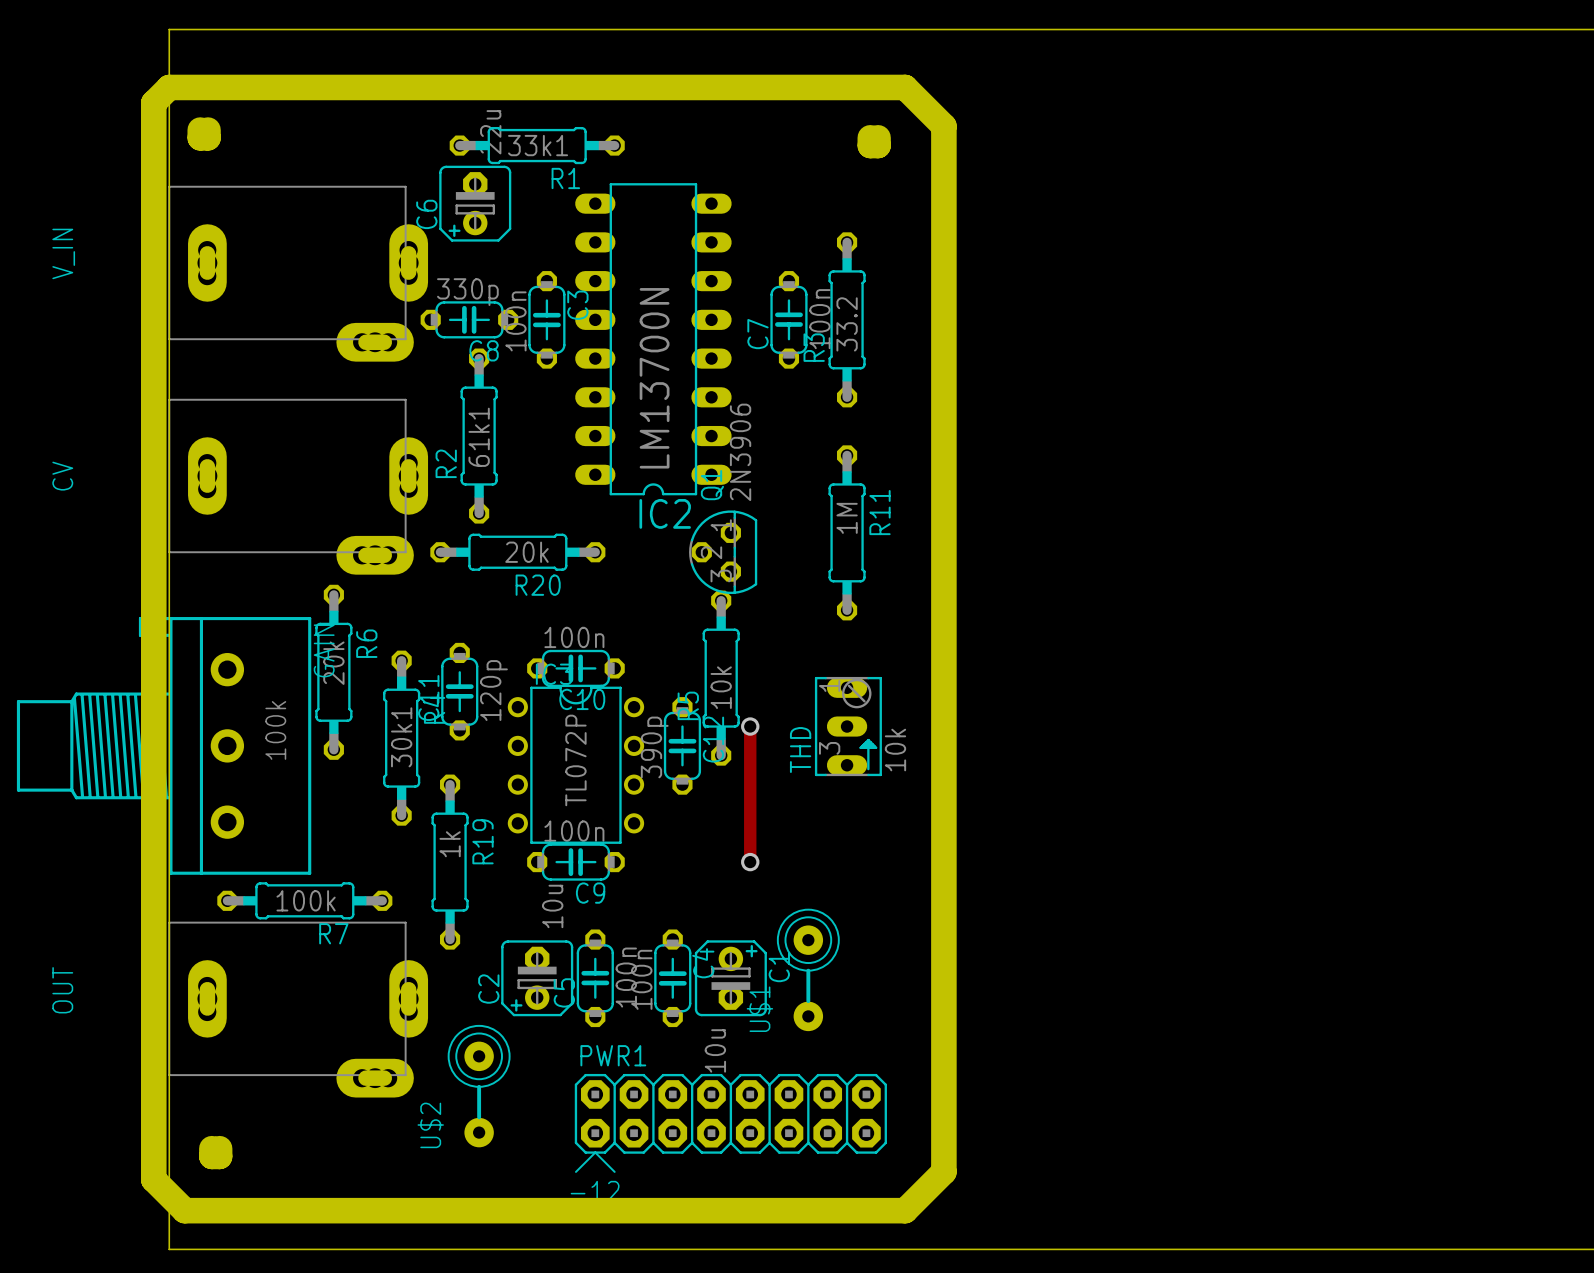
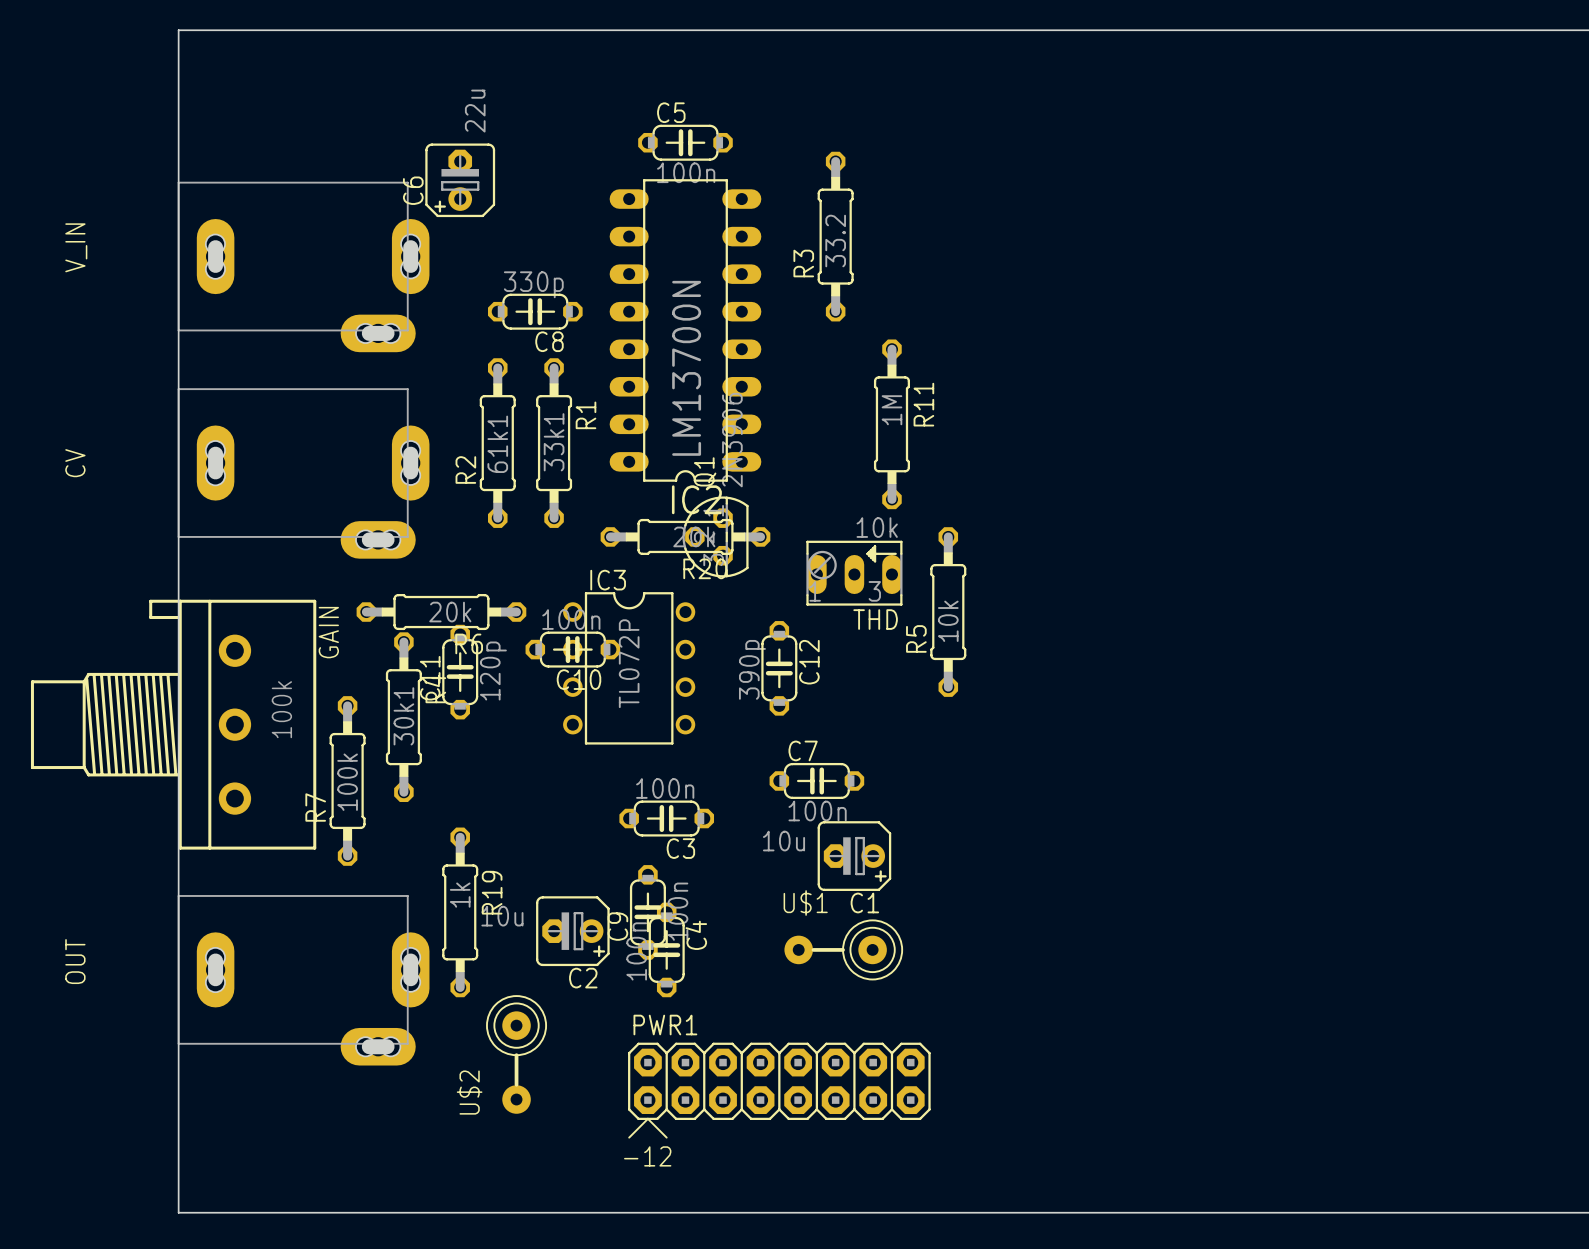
board edge: (169, 87) (905, 87) (943, 126) (943, 1171) (905, 1210) (184, 1210) (153, 1179) (153, 102) (169, 87) -> none
board edge: (200, 130) (200, 137) (208, 137) (208, 130) -> none
board edge: (870, 137) (870, 145) (878, 145) (878, 137) -> none
R1 rotation: 0° (537, 145) -> 90° clockwise (554, 443)
R1 position: (537, 145) -> (554, 443)
R1 name position: R1 (565, 178) -> R1 (585, 415)
C6 position: (475, 203) -> (460, 180)
C8 position: (469, 319) -> (535, 311)
C3 rotation: 0° (546, 319) -> 90° clockwise (666, 818)
C3 position: (546, 319) -> (666, 818)
C7 rotation: 0° (788, 319) -> 90° clockwise (816, 780)
C7 position: (788, 319) -> (816, 780)
R3 position: (847, 319) -> (835, 236)
IC2 position: (653, 339) -> (685, 330)
R2 position: (479, 436) -> (497, 443)
R11 position: (847, 532) -> (891, 424)
R20 position: (517, 552) -> (685, 536)
THD: none -> 10k (854, 573)
R6 rotation: 0° (333, 672) -> 90° clockwise (441, 612)
R6 position: (333, 672) -> (441, 612)
R5 position: (721, 678) -> (948, 612)
track: (750, 726) (750, 862) -> none
via: (750, 726) -> none
THD: 10k (848, 726) -> none
C12 position: (682, 745) -> (779, 668)
IC3 position: (575, 765) -> (629, 668)
R19 position: (450, 862) -> (460, 912)
C9 rotation: 0° (575, 862) -> 90° clockwise (647, 912)
C9 position: (575, 862) -> (647, 912)
via: (750, 862) -> none
R7 rotation: 0° (304, 900) -> 90° clockwise (347, 780)
U$1 rotation: 0° (808, 969) -> 90° clockwise (843, 949)
C2 rotation: 0° (537, 978) -> 90° counterclockwise (572, 931)
C5 rotation: 0° (595, 978) -> 90° clockwise (685, 142)
C5 position: (595, 978) -> (685, 142)
C1 rotation: 0° (730, 978) -> 90° clockwise (854, 856)
C1 position: (730, 978) -> (854, 856)
U$2 position: (479, 1086) -> (516, 1054)
PWR1 position: (730, 1123) -> (779, 1090)
board edge: (211, 1148) (211, 1156) (219, 1156) (219, 1148) -> none

